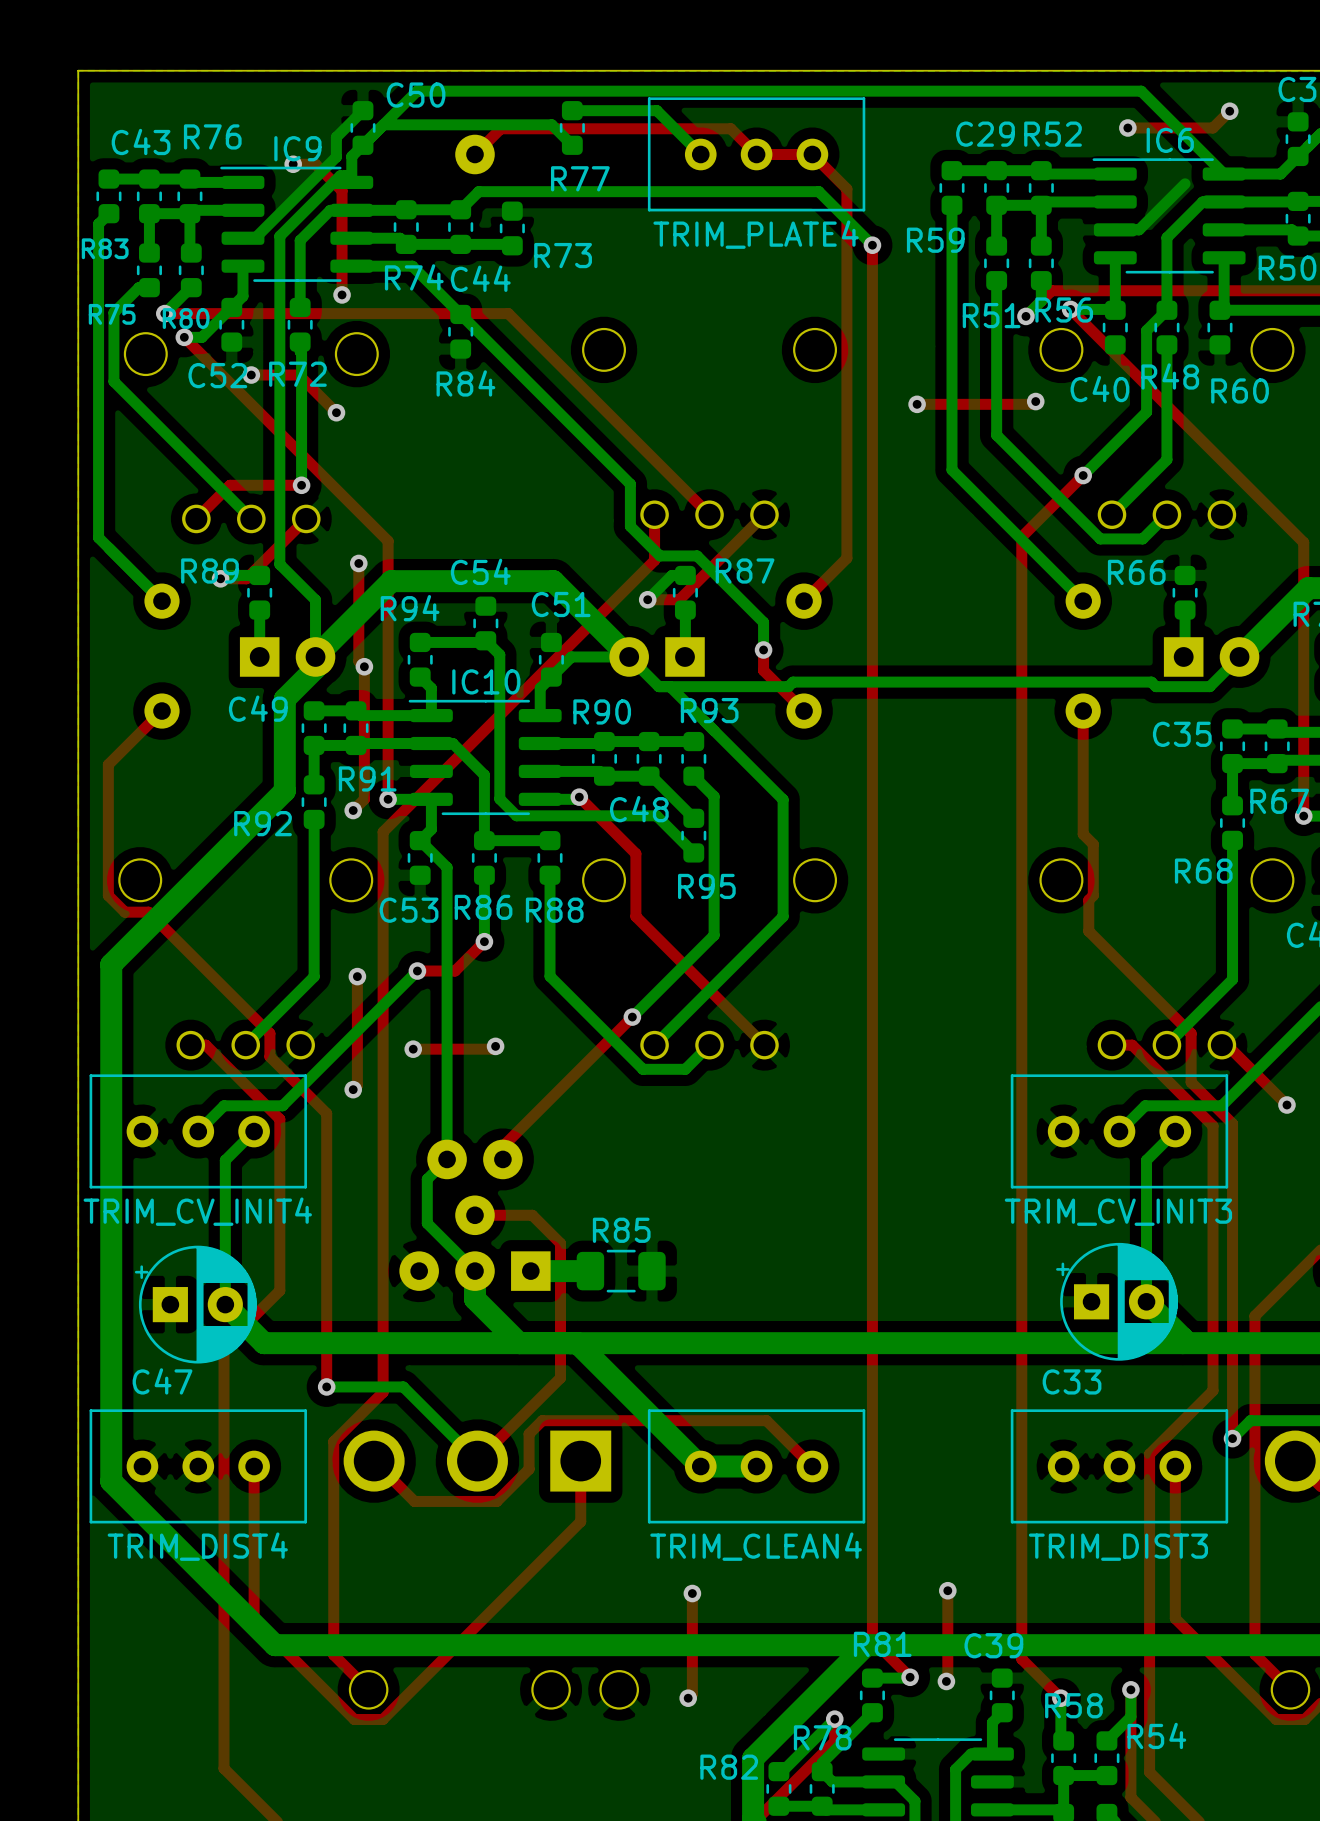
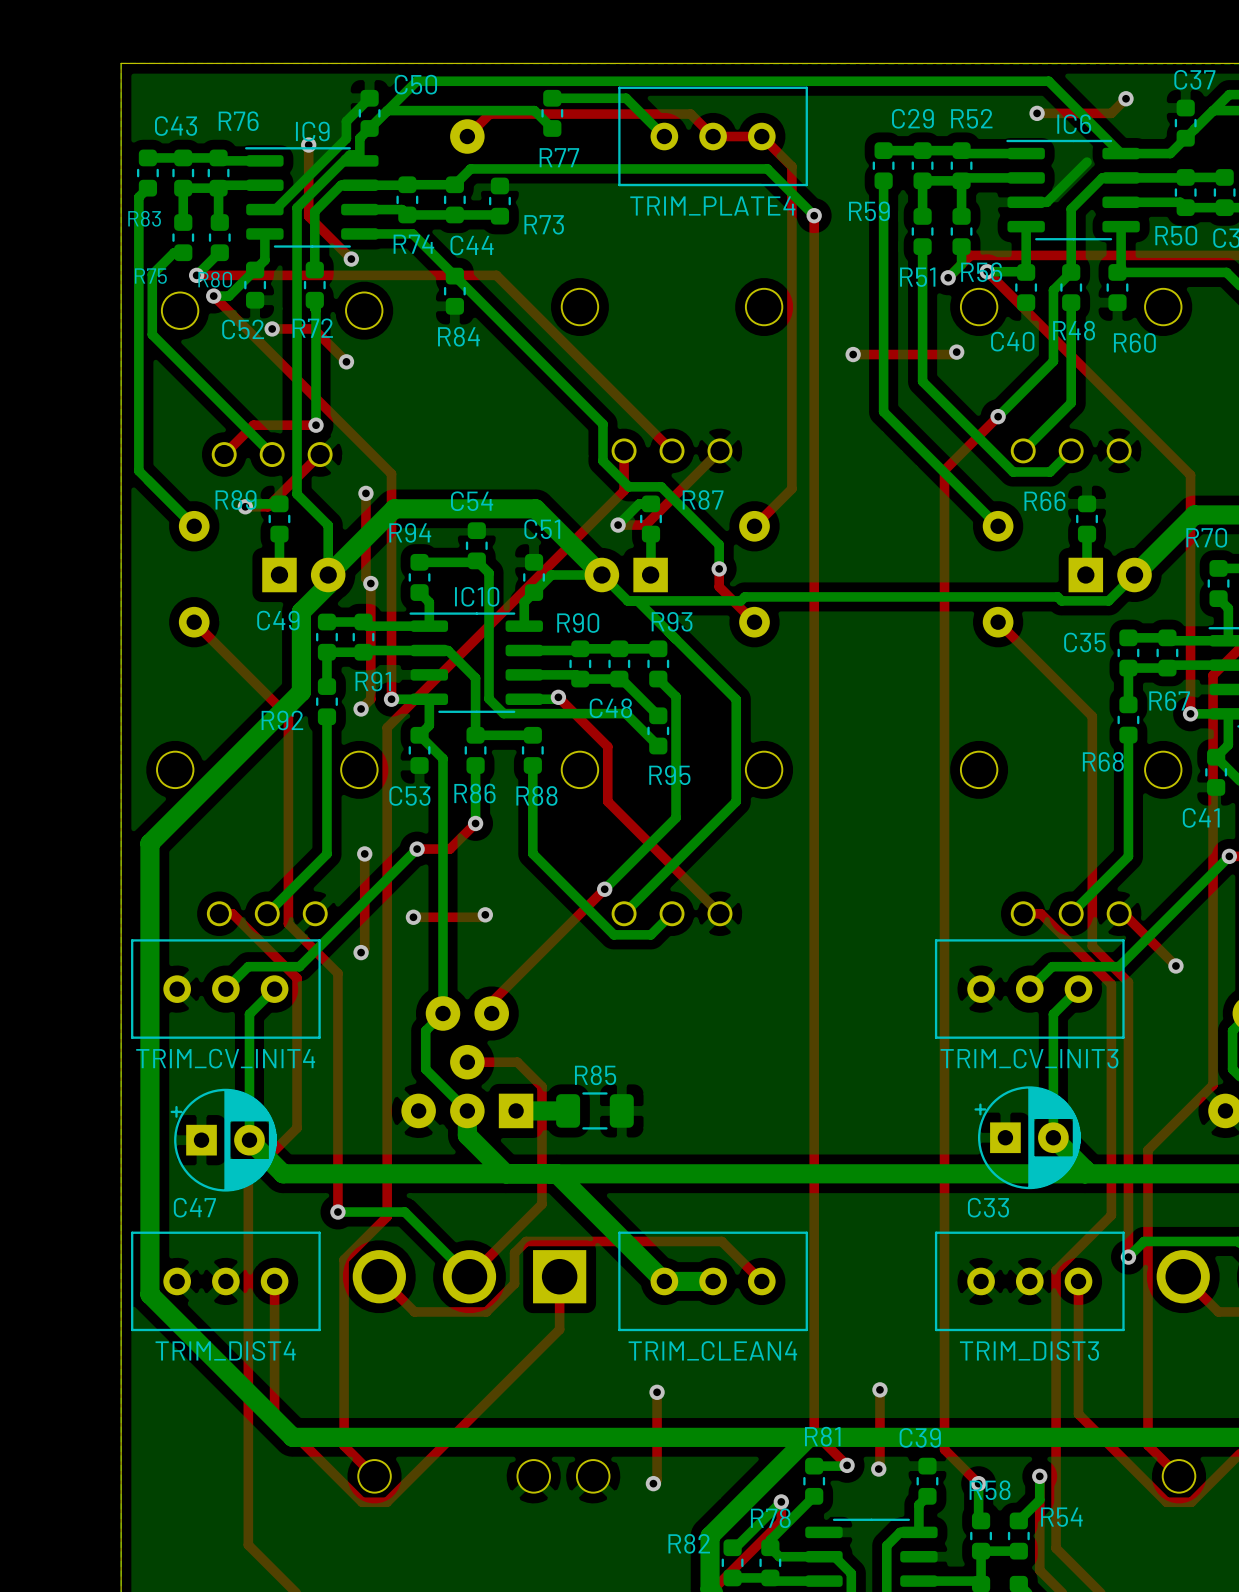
top track: (293, 164) (315, 164) (342, 190) (342, 294) -> (308, 145) (308, 216) (351, 259)
top track: (161, 711) (108, 764) (108, 895) (124, 912) (148, 912) (269, 1033) -> (194, 622) (288, 716) (288, 903)
top track: (1083, 711) (1083, 834) (1093, 844) (1093, 895) (1088, 900) (1088, 931) (1191, 1033) -> (998, 622) (1092, 716) (1092, 903)

